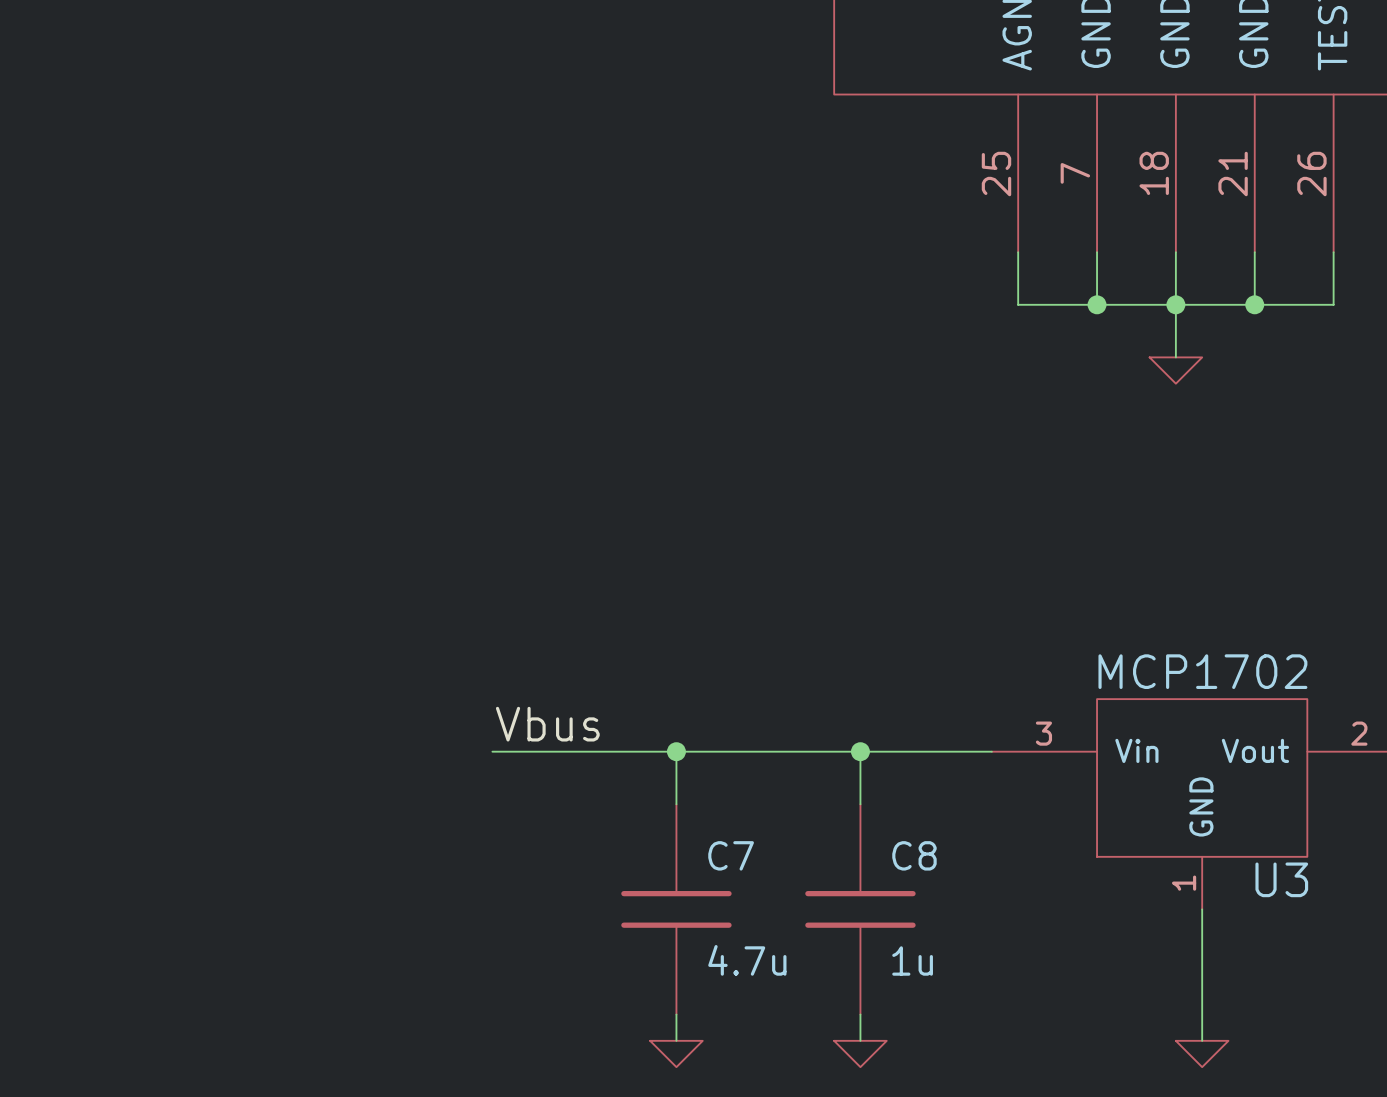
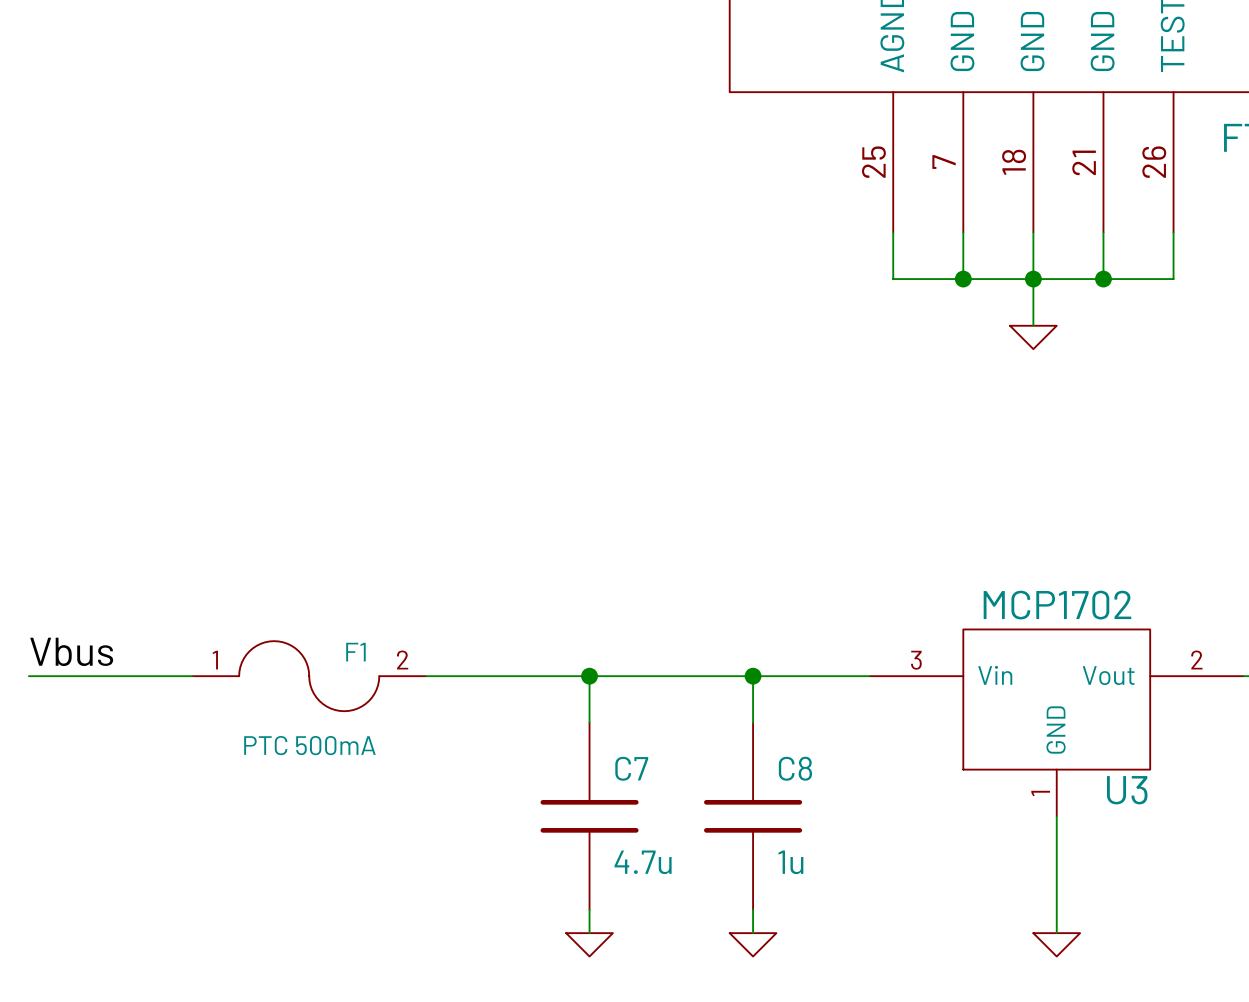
label position: Vbus (547, 724) -> Vbus (71, 651)
wire: none -> (28, 676) (192, 676)
F1: none -> PTC 500mA (309, 676)

